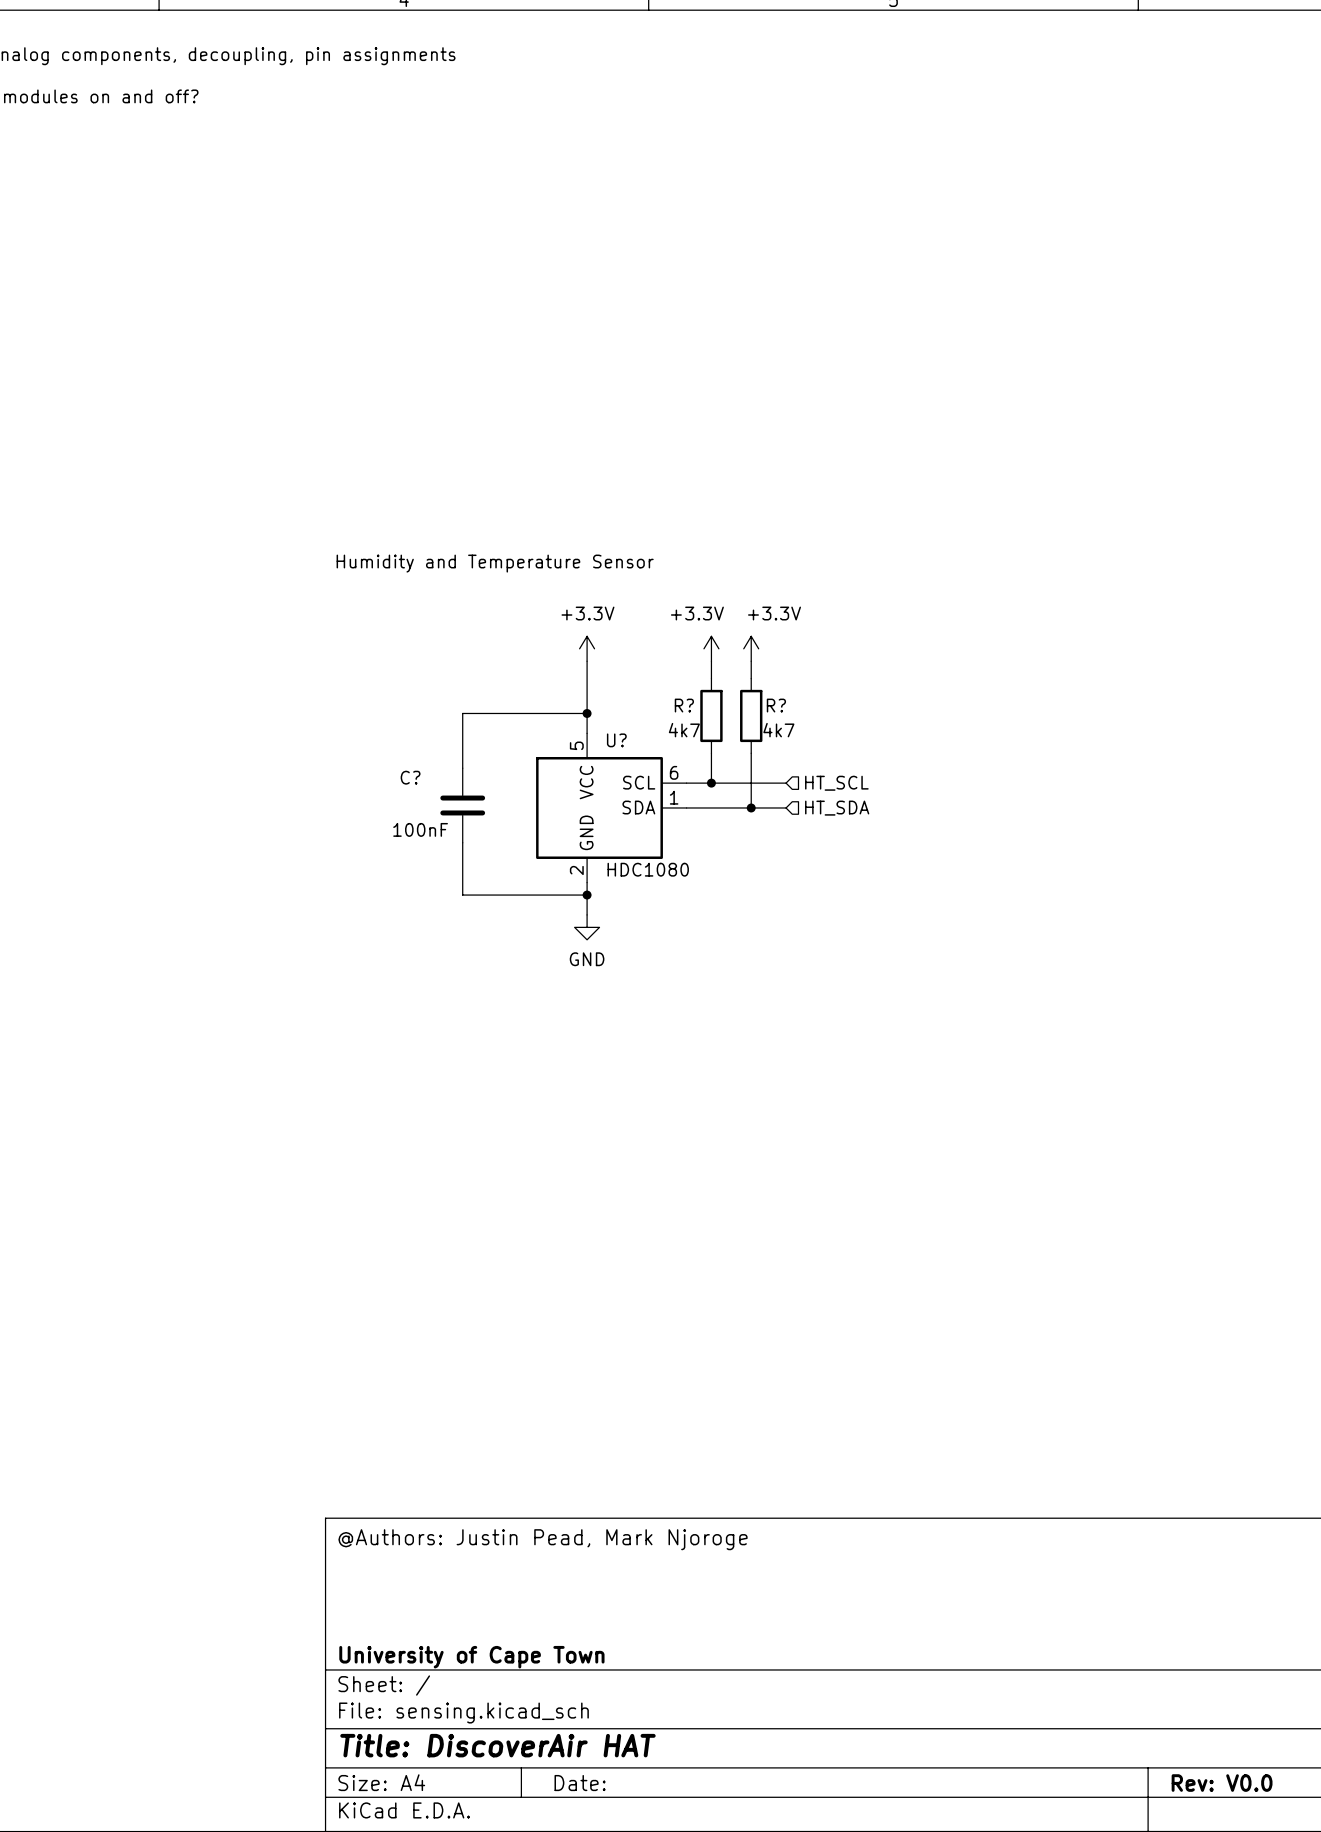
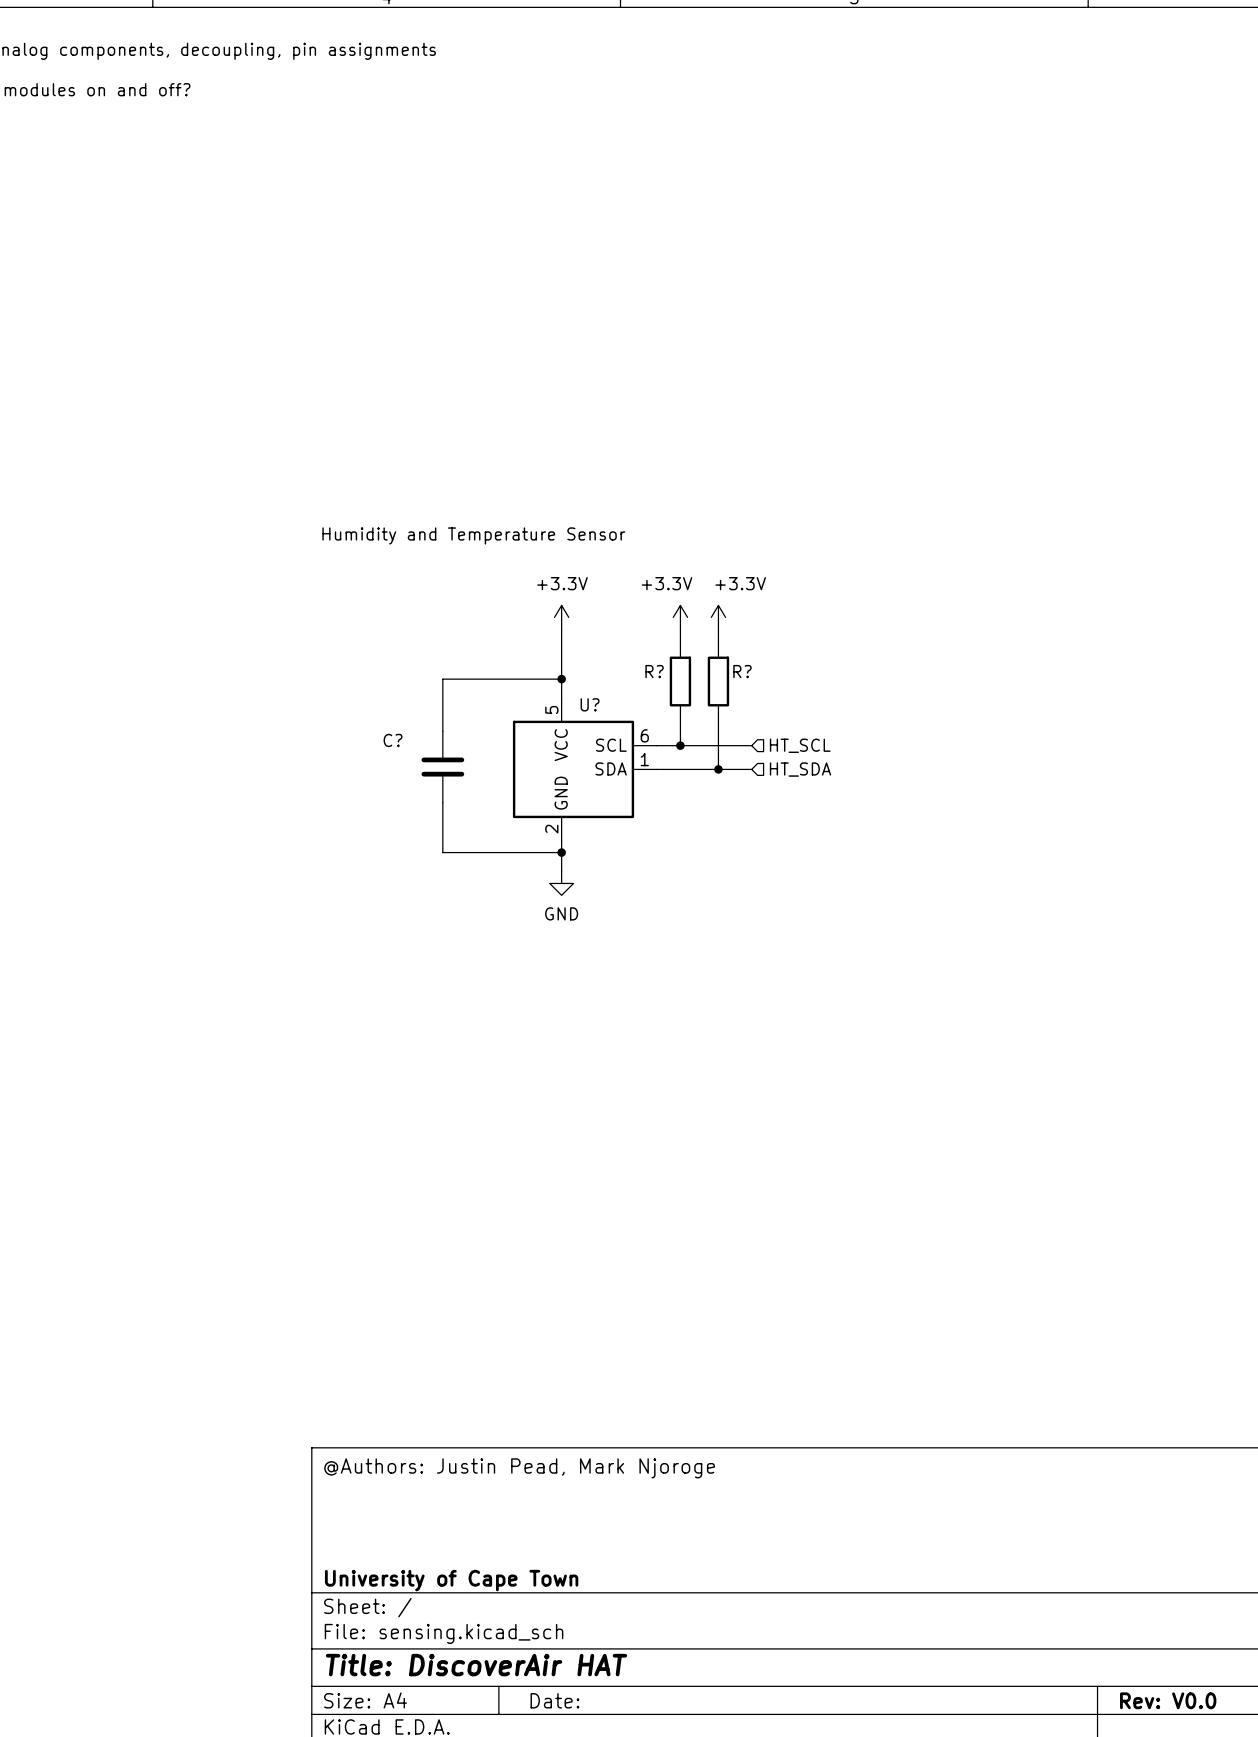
R? value: 4k7 (684, 730) -> none
R? value: 4k7 (778, 730) -> none
C? value: 100nF (420, 829) -> none
U? value: HDC1080 (648, 869) -> none

